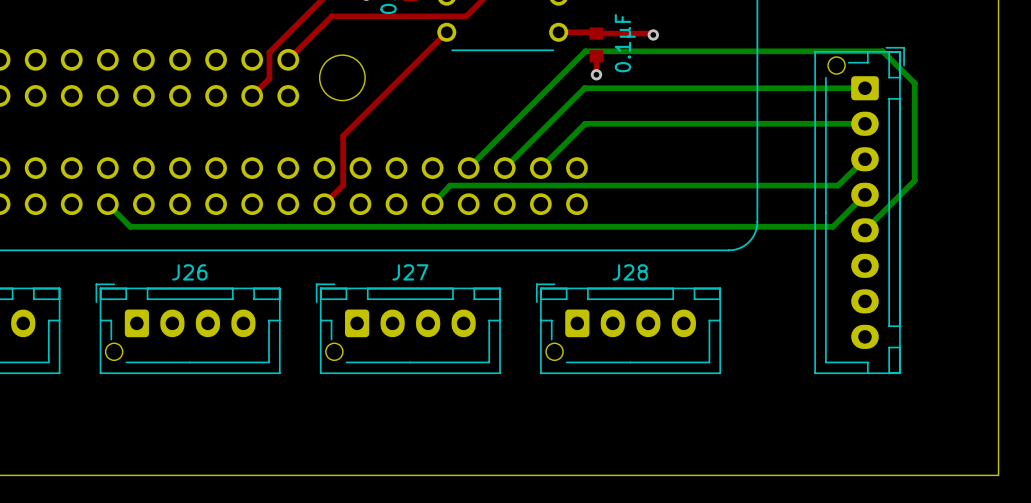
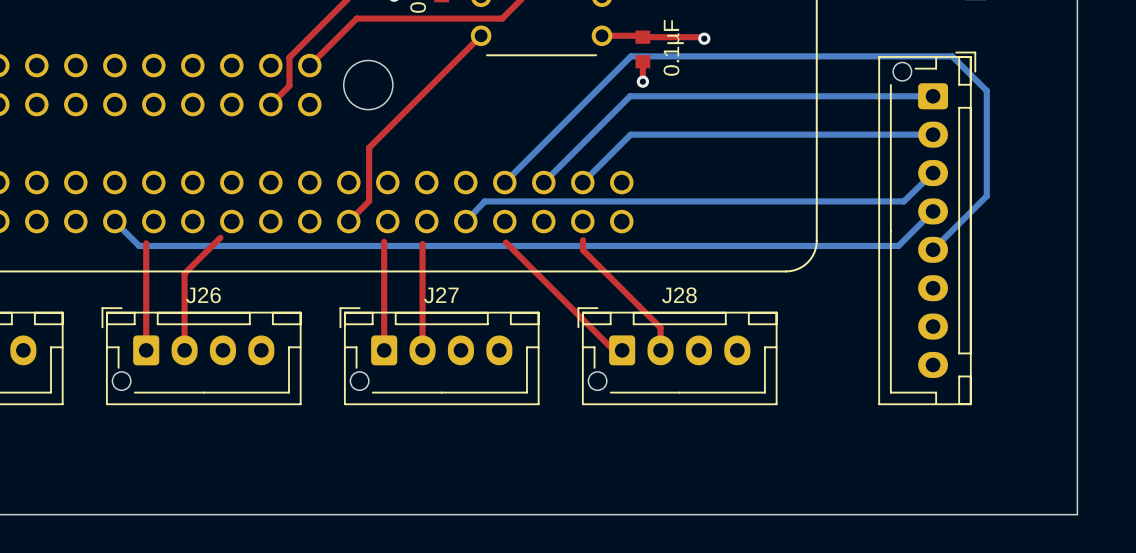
top track: none -> (220, 237) (184, 273) (184, 350)
top track: none -> (583, 240) (583, 250) (660, 327) (660, 350)
top track: none -> (384, 241) (384, 350)
top track: none -> (505, 242) (613, 350) (622, 350)
top track: none -> (146, 243) (146, 350)
top track: none -> (422, 244) (422, 350)

